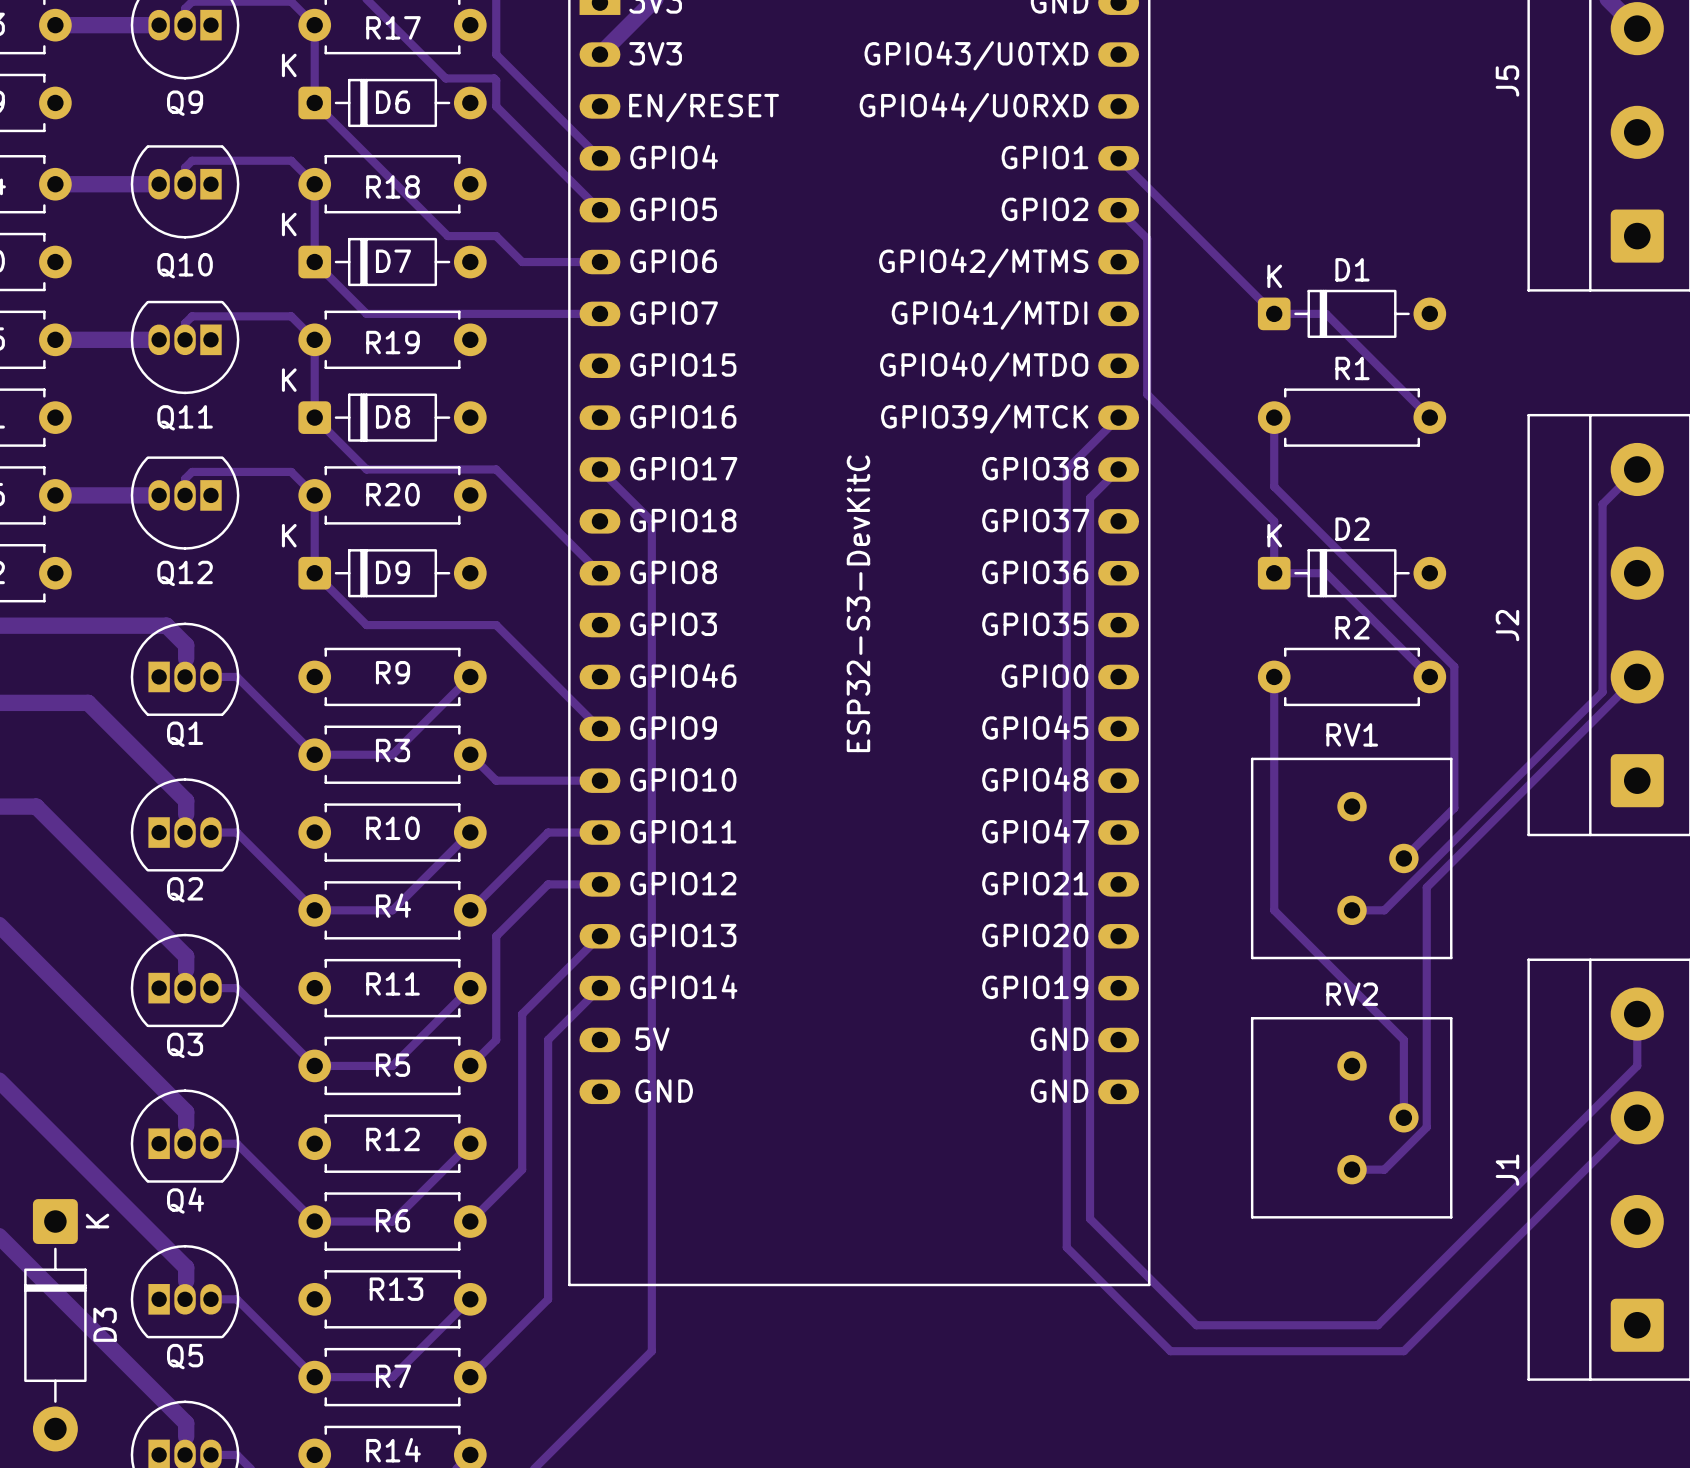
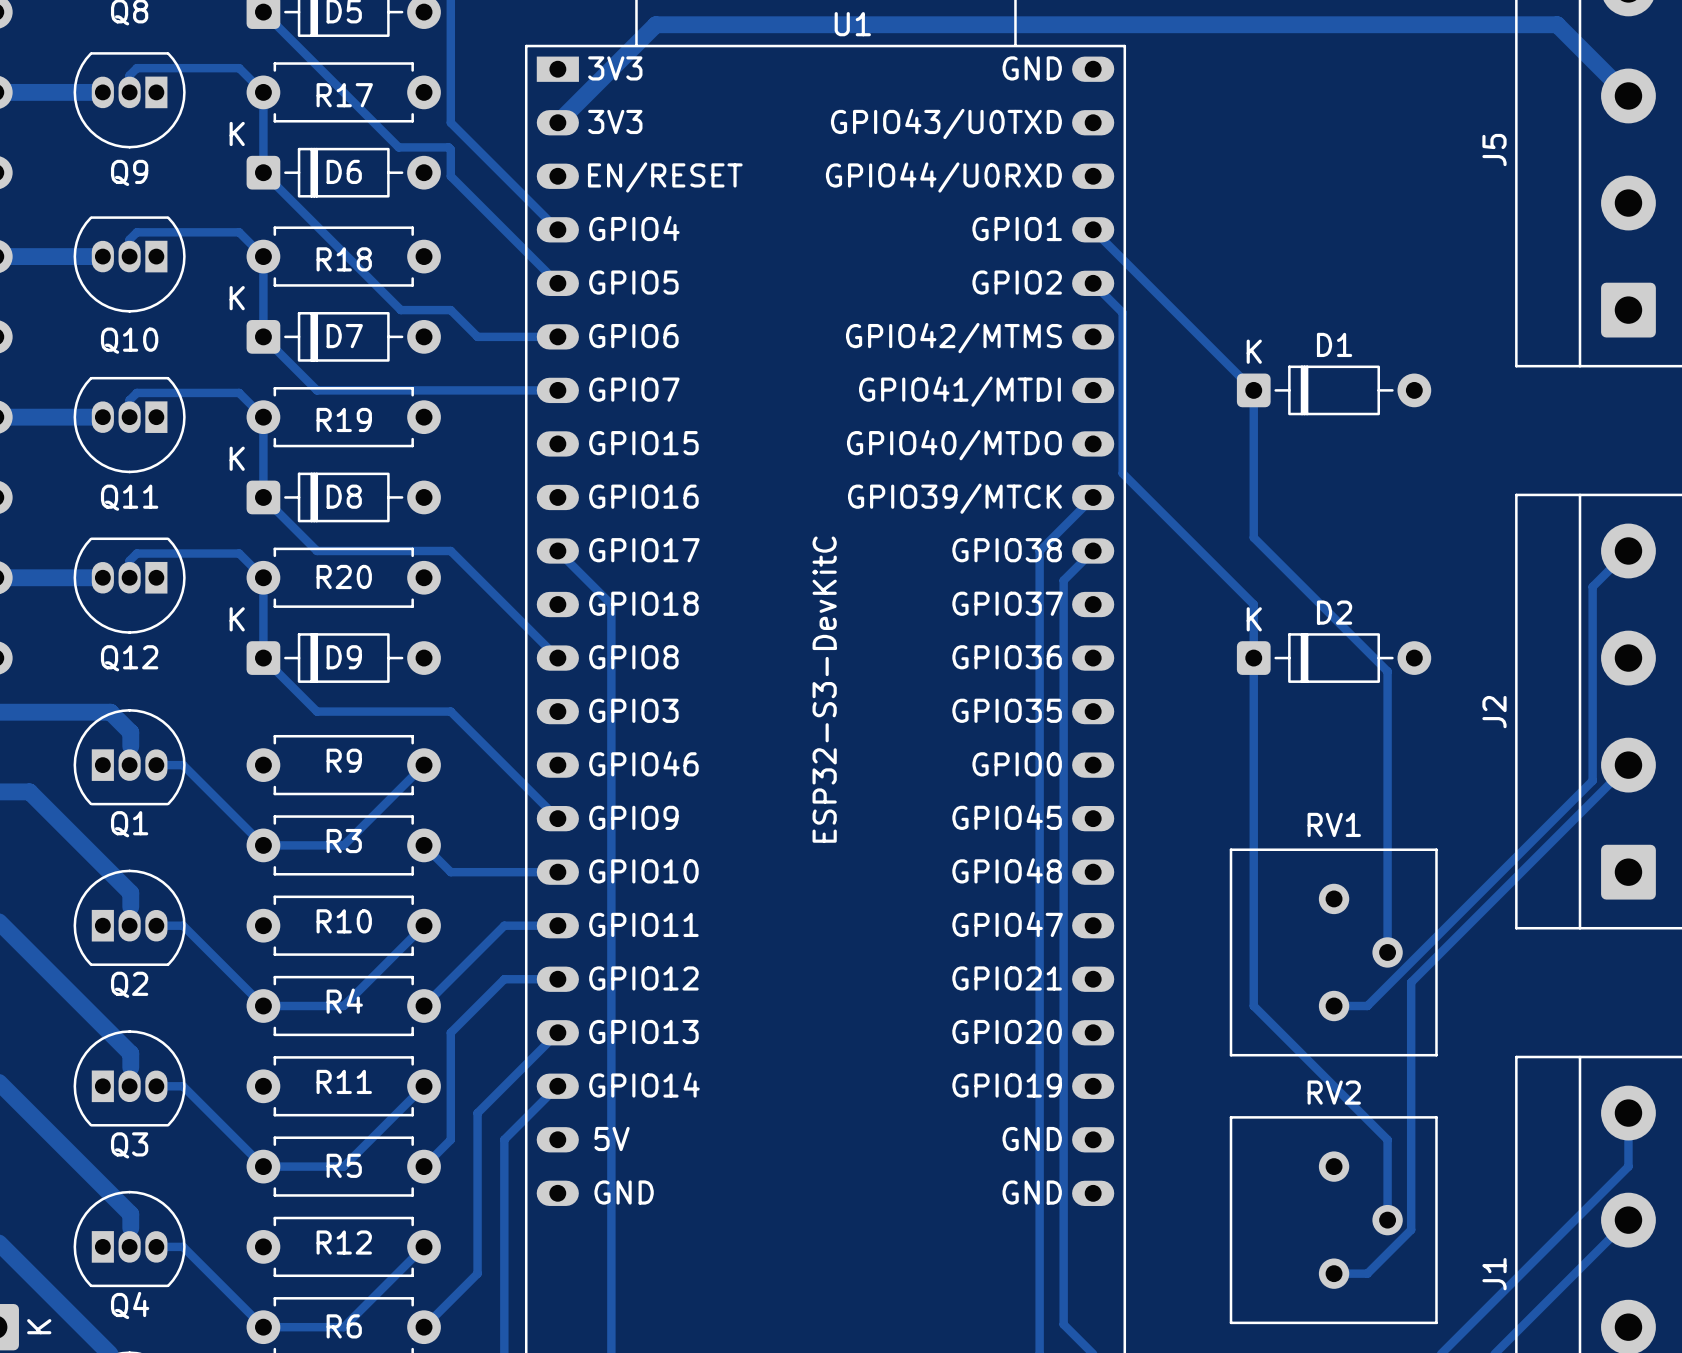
track: (1274, 313) (1326, 313) (1429, 417) -> (1253, 390) (1253, 497)
R1: (1352, 417) -> none
track: (1274, 456) (1274, 486) (1454, 666) (1454, 808) (1403, 858) -> (1253, 537) (1387, 671) (1387, 952)
track: (1274, 573) (1326, 573) (1429, 676) -> (1253, 658) (1253, 765)
R2: (1352, 676) -> none

